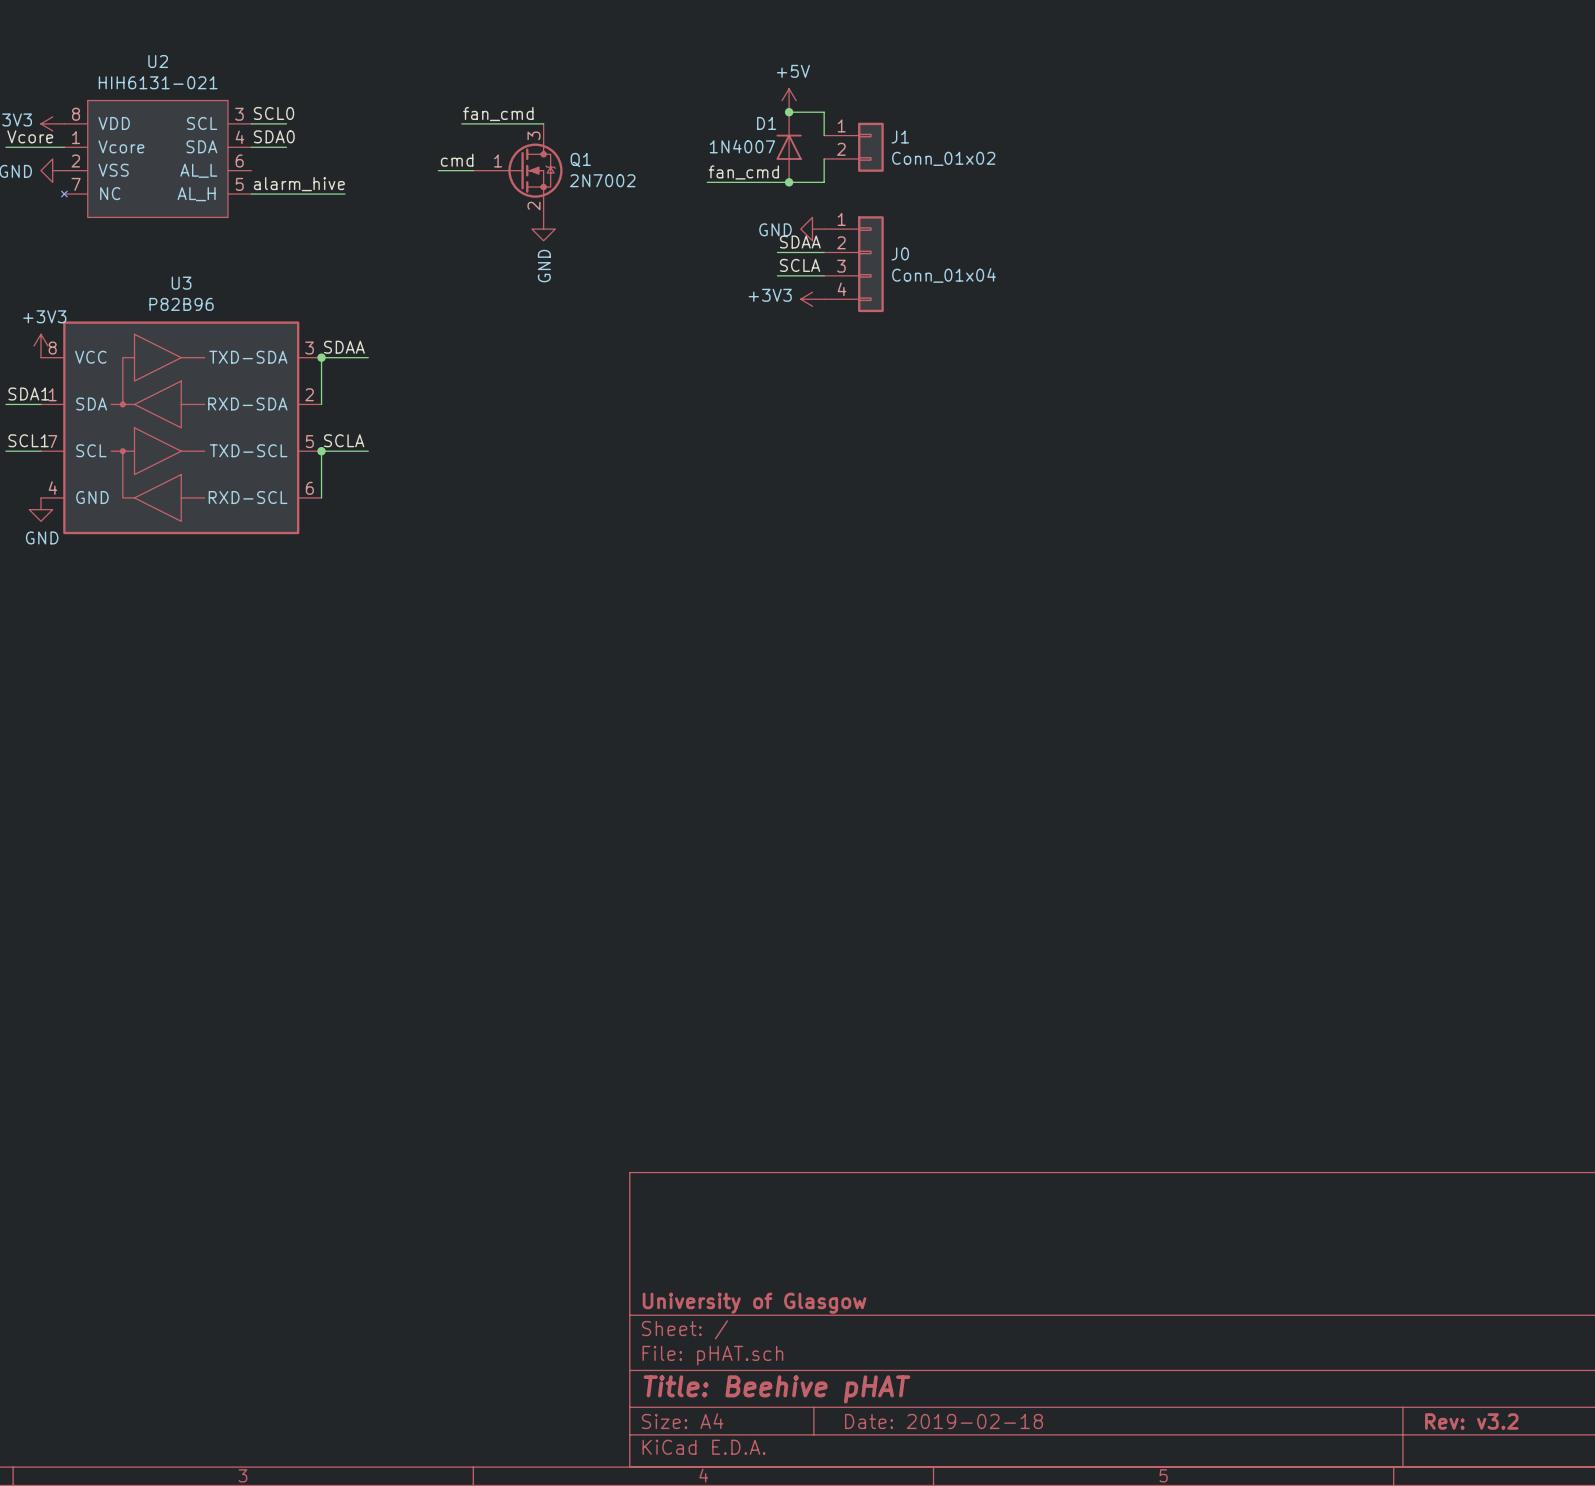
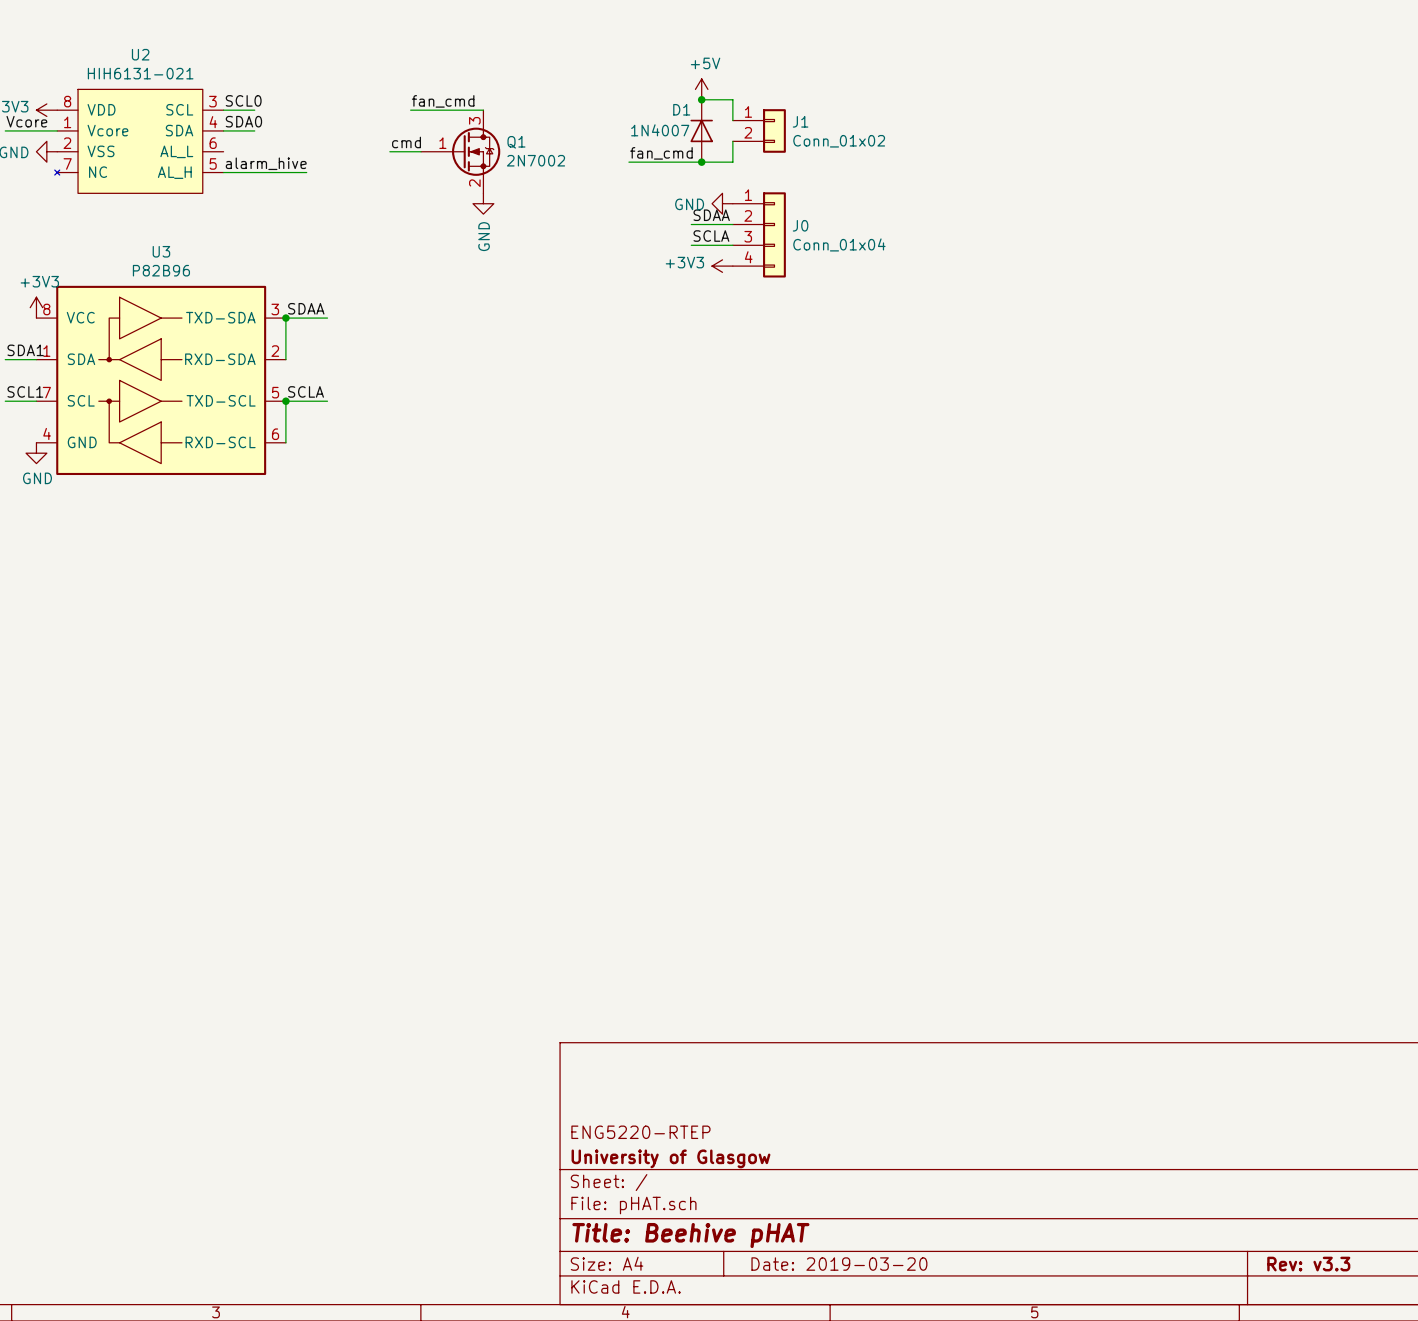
title block: none -> ENG5220-RTEP (640, 1132)
title block: Date: 2019-02-18 (943, 1421) -> Date: 2019-03-20 (839, 1264)
title block: Rev: v3.2 (1471, 1421) -> Rev: v3.3 (1308, 1264)

